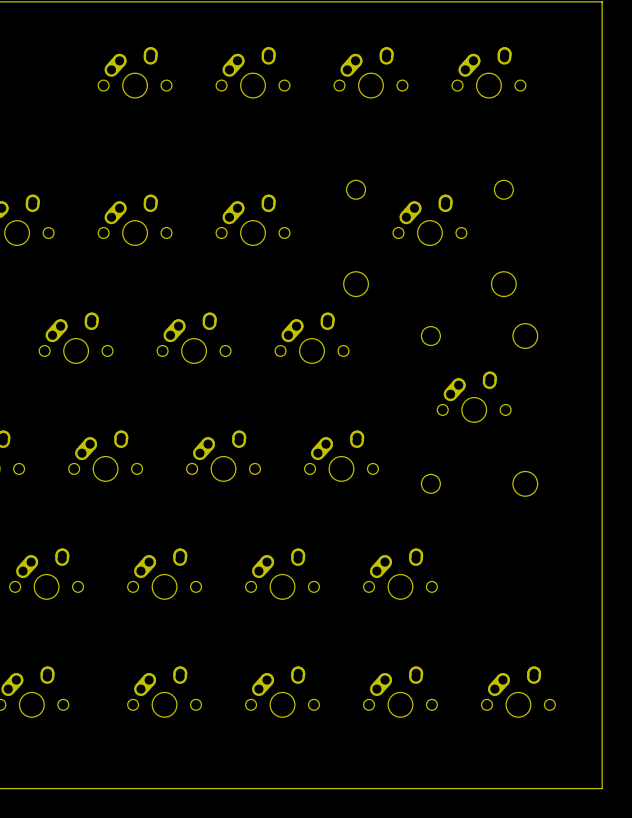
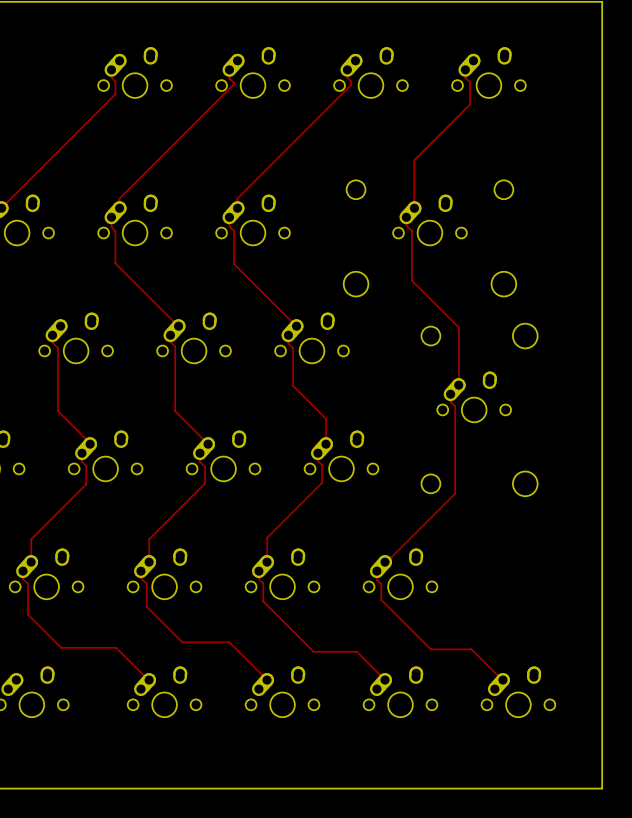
track: none -> (111, 69) (111, 77) (115, 81) (115, 94) (2, 209)
track: none -> (229, 69) (229, 78) (234, 84) (119, 198) (119, 208)
track: none -> (347, 69) (347, 77) (351, 81) (351, 84) (237, 198) (238, 209)
track: none -> (465, 69) (465, 77) (470, 82) (470, 104) (414, 160) (414, 209)
track: none -> (111, 217) (111, 227) (115, 231) (115, 263) (178, 326)
track: none -> (229, 217) (229, 226) (234, 231) (234, 264) (296, 326)
track: none -> (406, 217) (406, 225) (411, 231) (411, 280) (459, 327) (459, 385)
track: none -> (52, 335) (52, 342) (58, 348) (58, 411) (90, 443)
track: none -> (170, 335) (170, 341) (175, 346) (175, 411) (208, 444)
track: none -> (288, 335) (288, 343) (293, 348) (293, 385) (326, 418) (326, 444)
track: none -> (450, 394) (450, 401) (455, 406) (455, 493) (385, 563)
track: none -> (82, 453) (82, 461) (86, 466) (86, 484) (31, 539) (31, 562)
track: none -> (199, 453) (199, 461) (205, 466) (205, 483) (149, 539) (149, 562)
track: none -> (317, 453) (317, 461) (322, 465) (322, 482) (267, 537) (267, 562)
track: none -> (23, 571) (23, 579) (28, 584) (28, 614) (61, 647) (116, 647) (149, 680)
track: none -> (140, 571) (140, 578) (146, 584) (146, 606) (182, 642) (229, 642) (267, 680)
track: none -> (258, 571) (258, 579) (263, 583) (263, 601) (313, 651) (356, 651) (384, 679)
track: none -> (376, 571) (376, 579) (381, 584) (381, 599) (430, 649) (471, 649) (503, 680)

